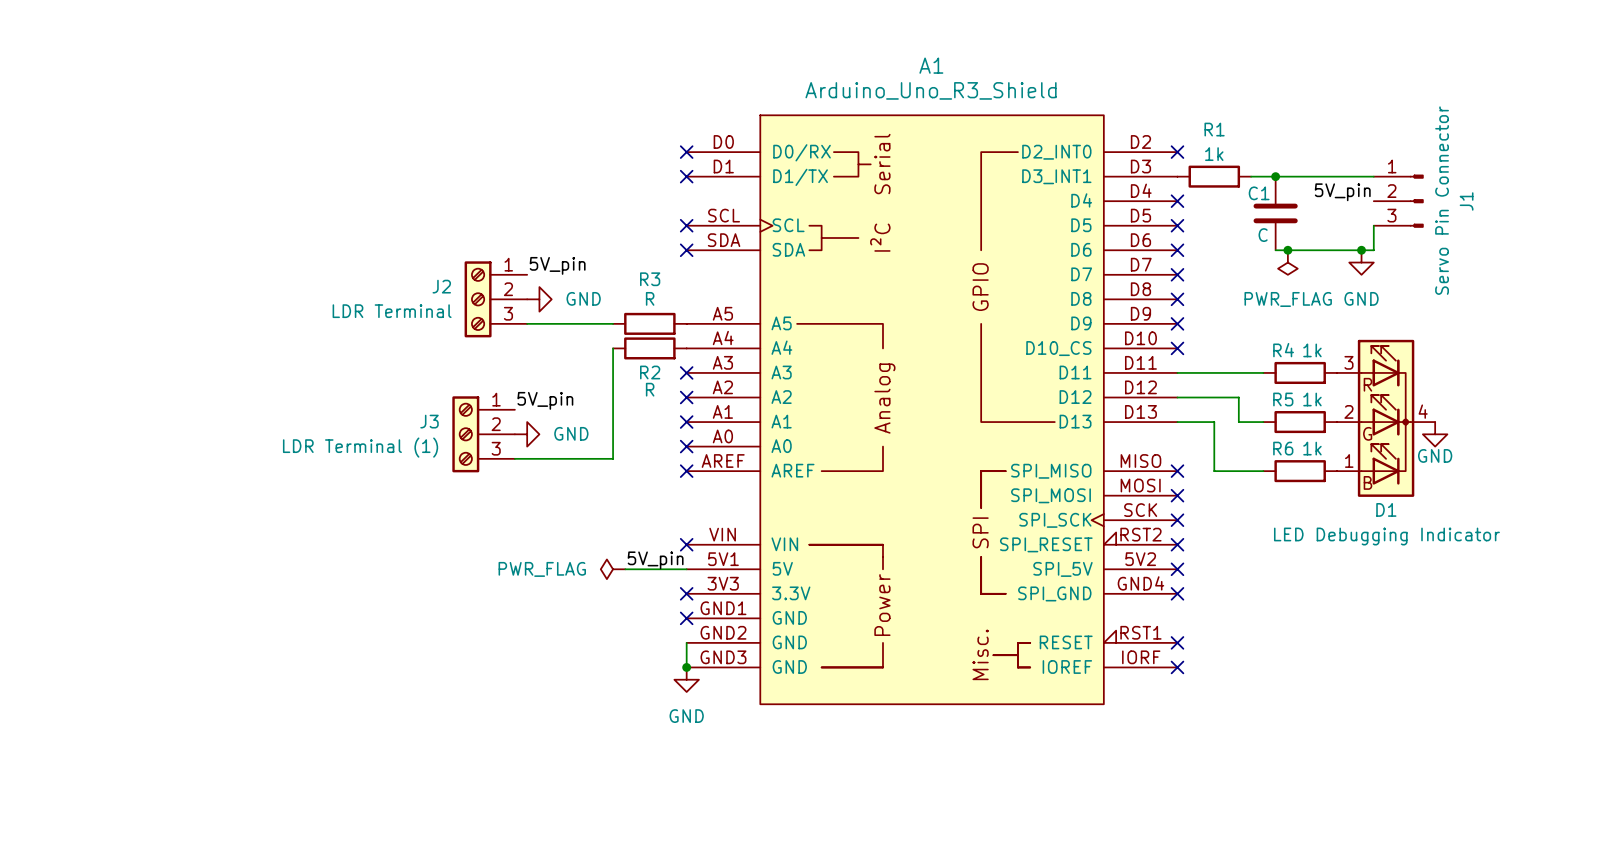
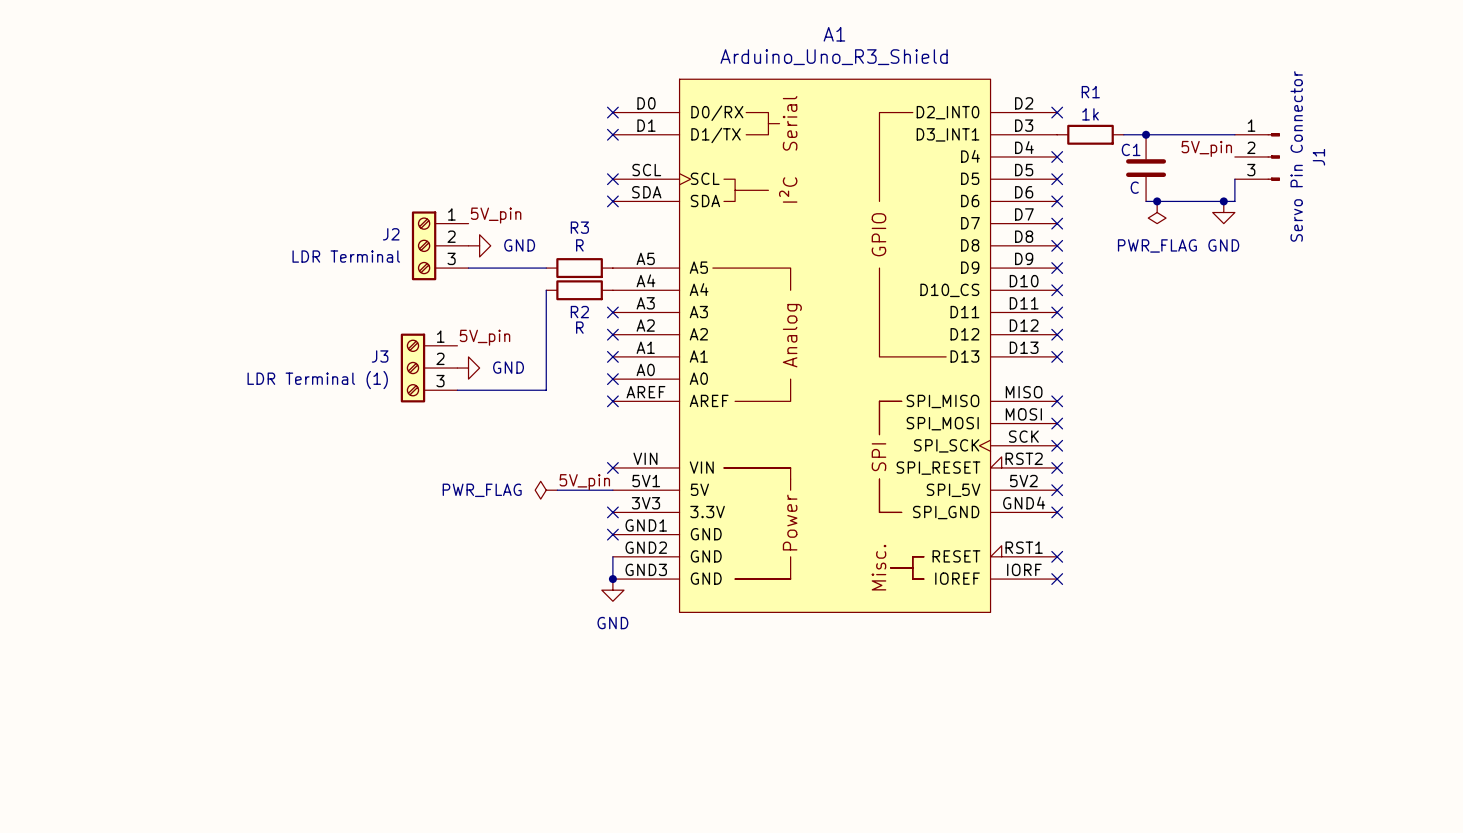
wire: (1177, 372) (1263, 372) -> none
no-connect mark: none -> (1057, 312)
R4: 1k (1300, 372) -> none
wire: (1177, 397) (1238, 397) (1238, 422) (1263, 422) -> none
no-connect mark: none -> (1057, 334)
D1: LED Debugging Indicator (1386, 418) -> none
wire: (1177, 422) (1214, 422) (1214, 471) (1263, 471) -> none
no-connect mark: none -> (1057, 356)
R5: 1k (1300, 422) -> none
power symbol: GND (1435, 434) -> none
R6: 1k (1300, 471) -> none

